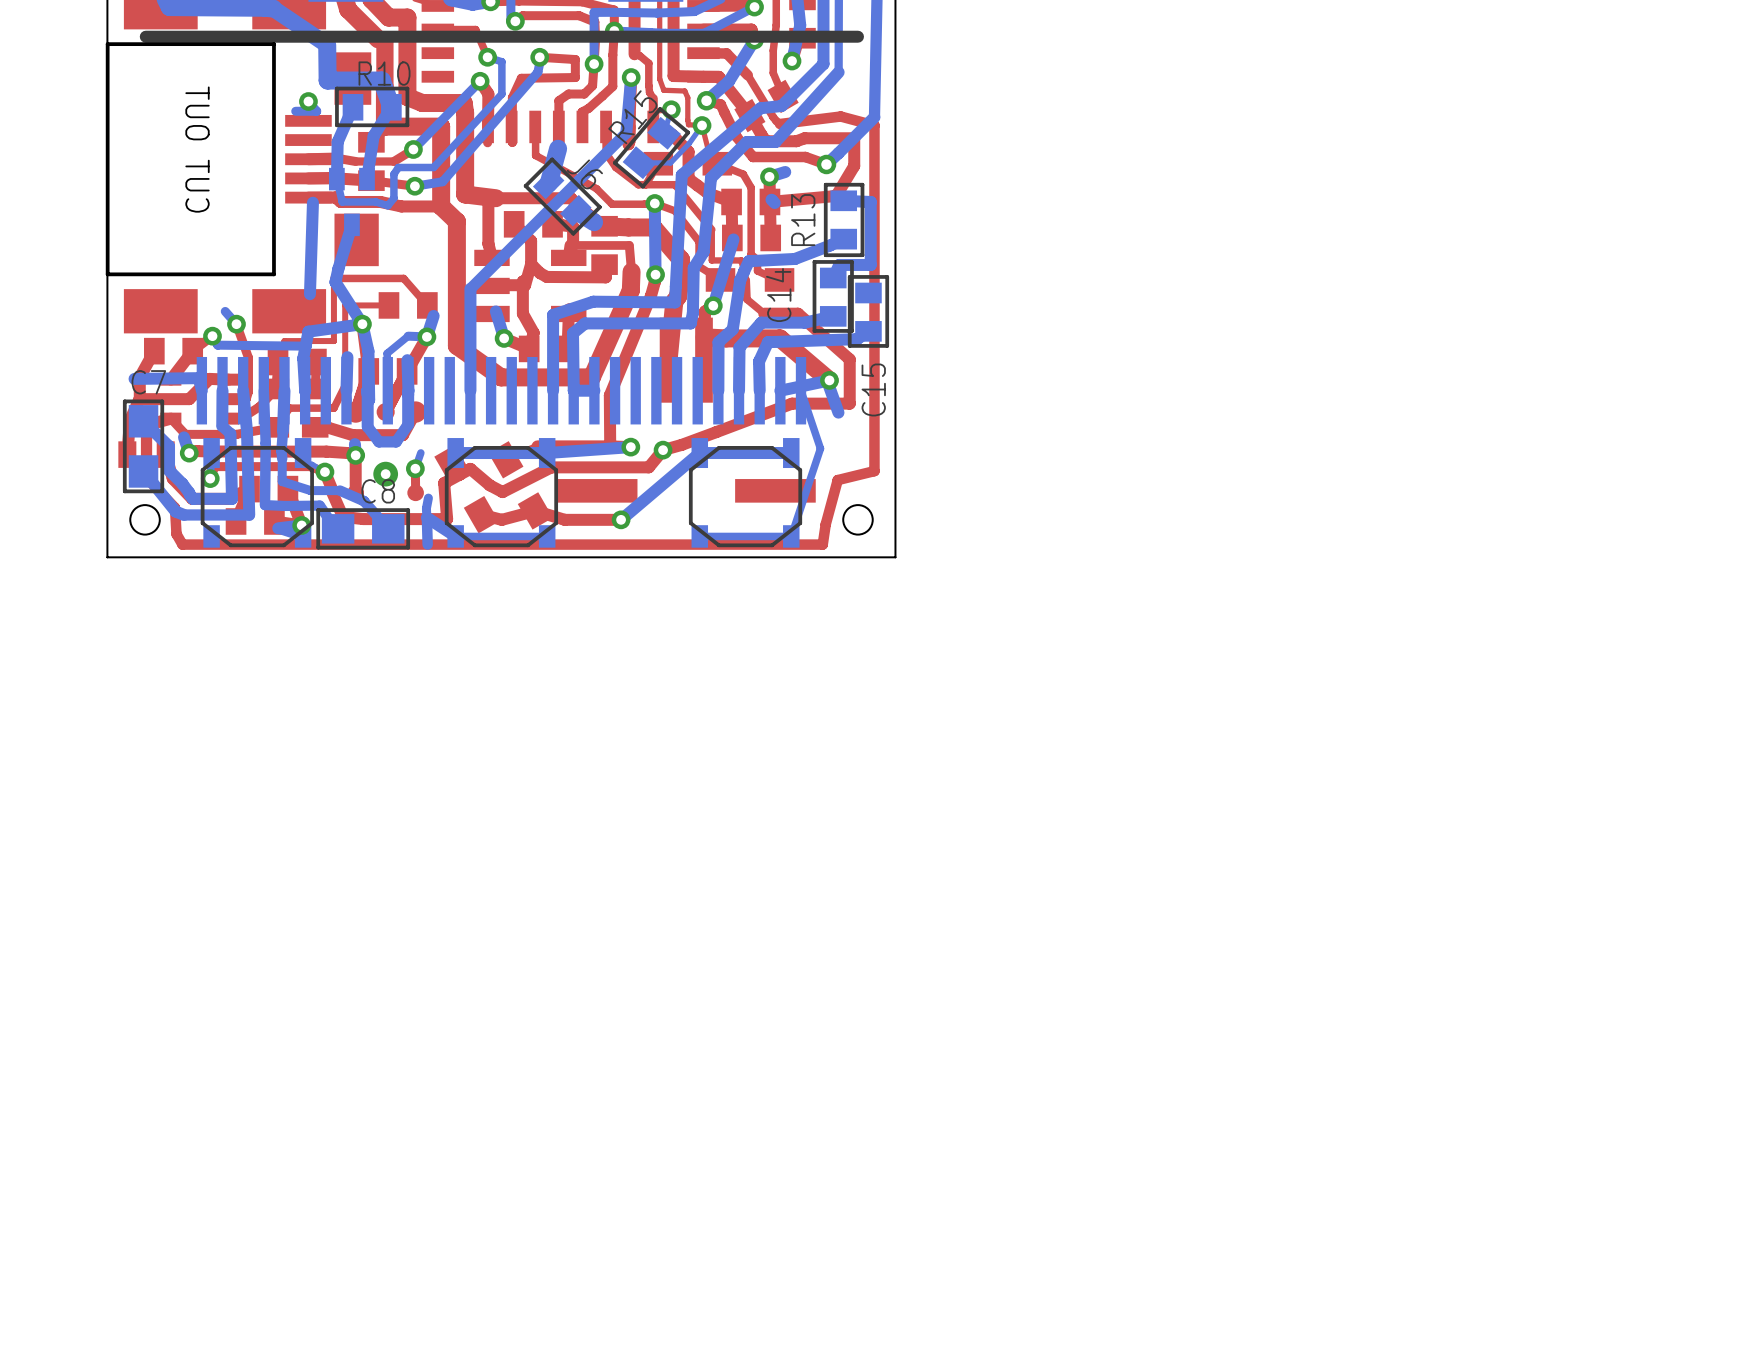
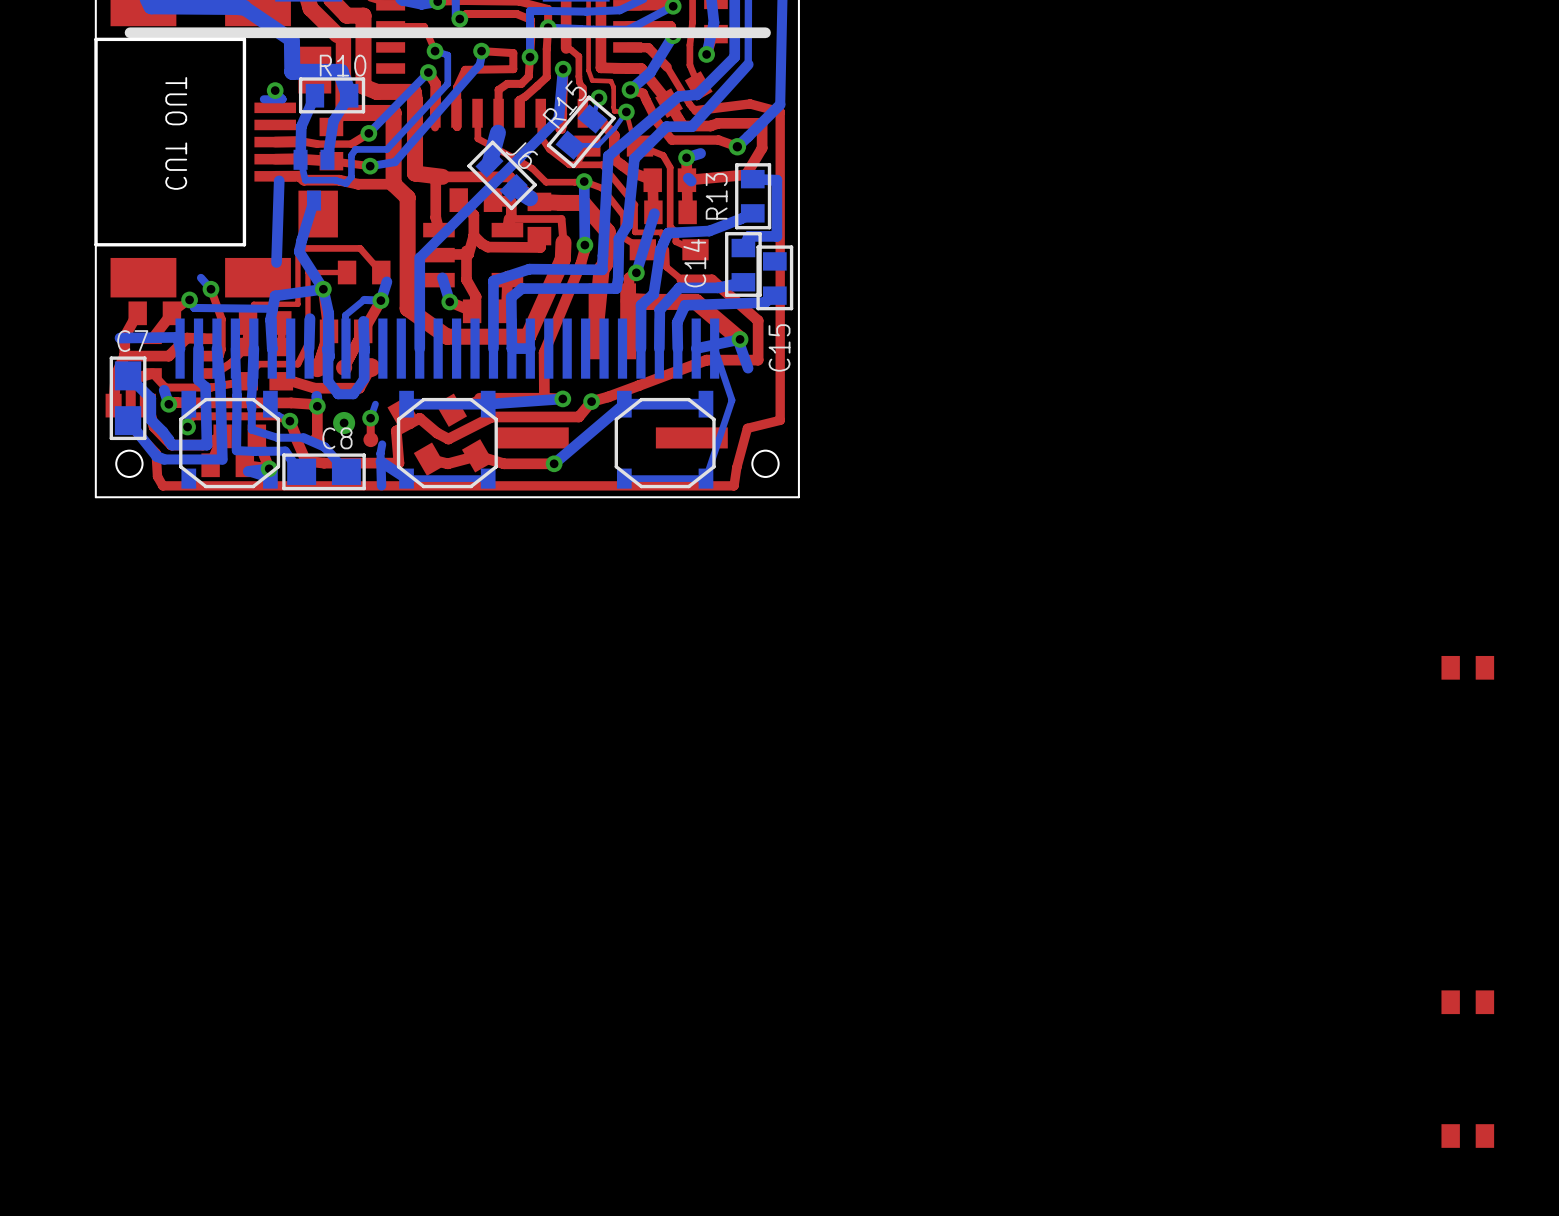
part: none -> (1467, 667)
part: none -> (1467, 1002)
part: none -> (1467, 1136)

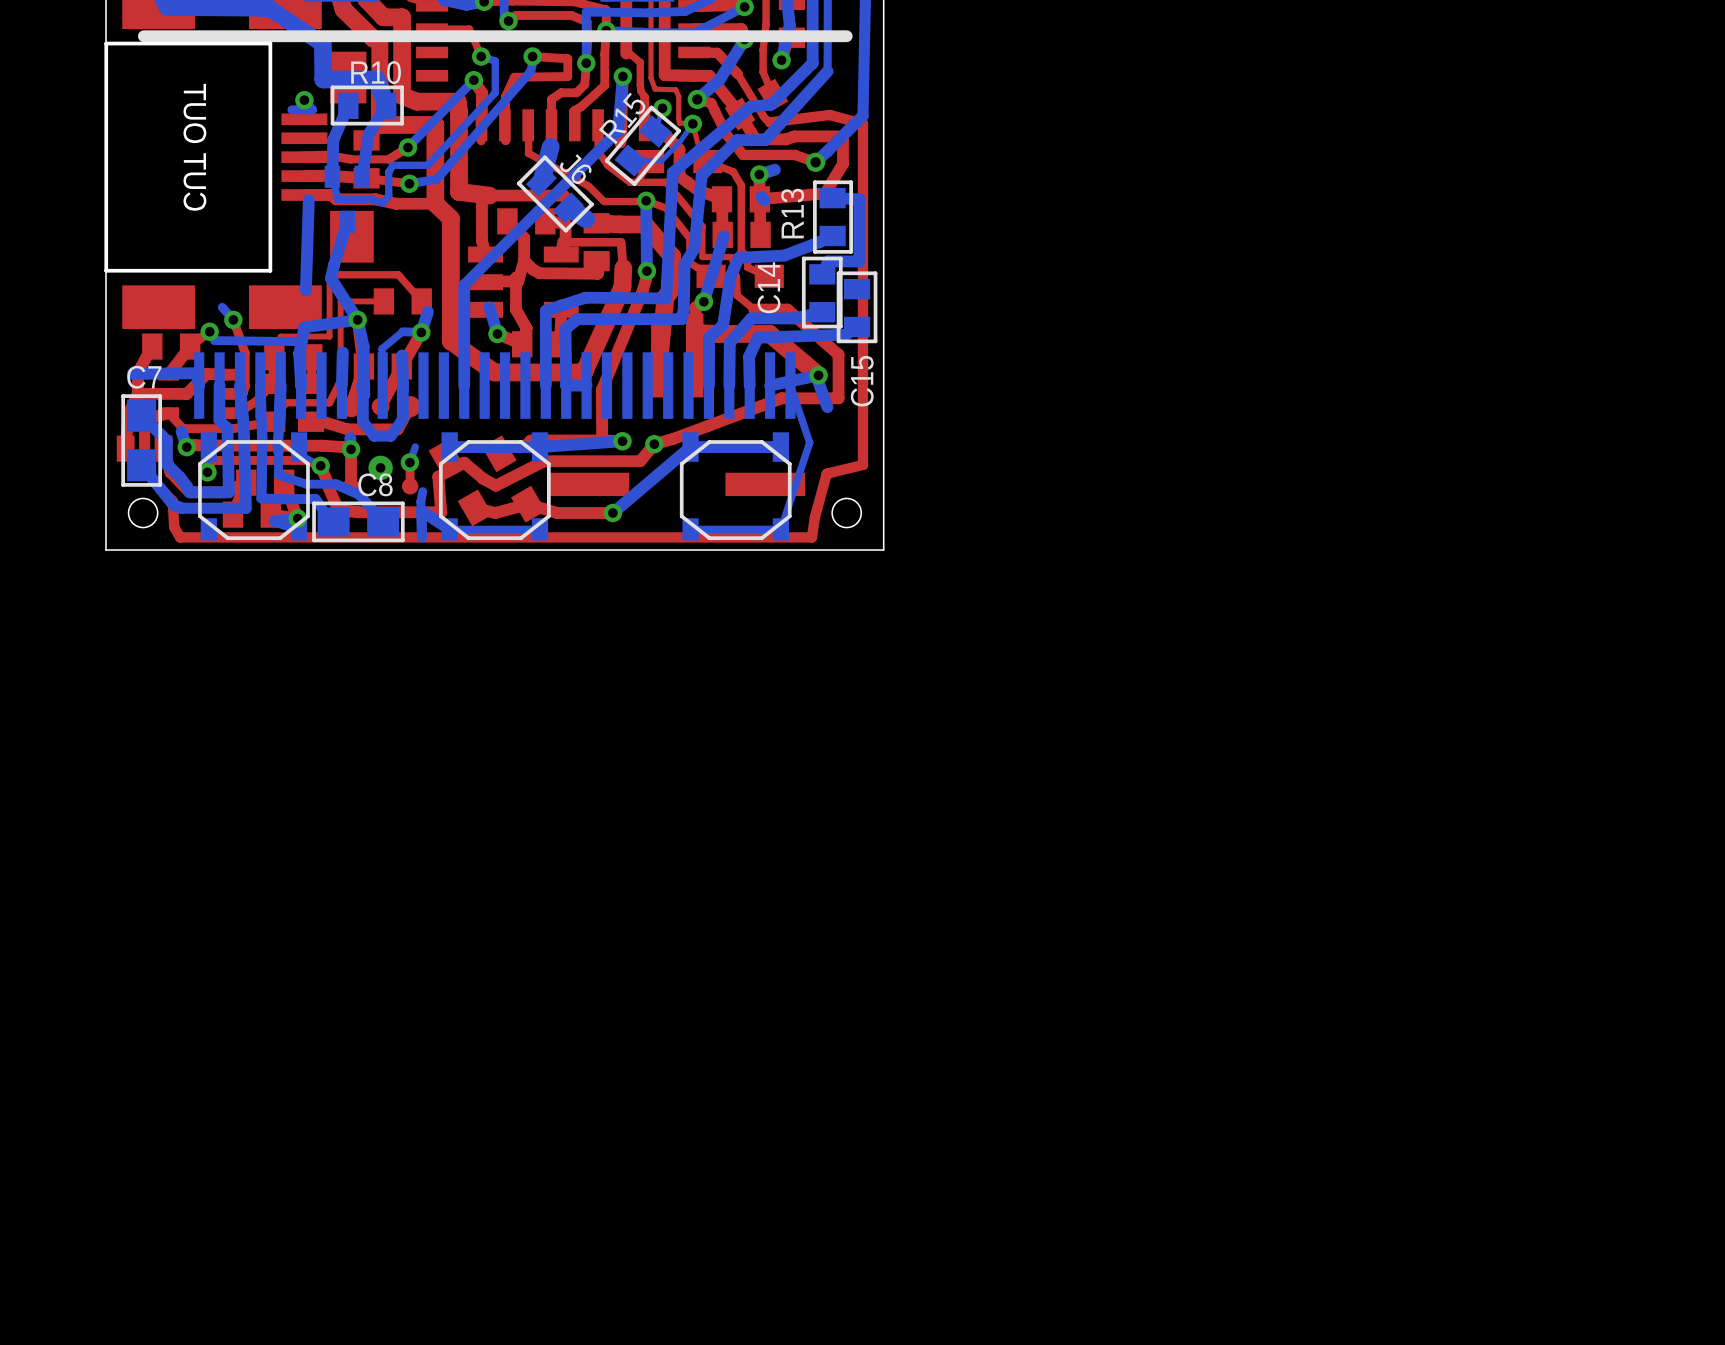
part: (1467, 667) -> none
part: (1467, 1002) -> none
part: (1467, 1136) -> none

